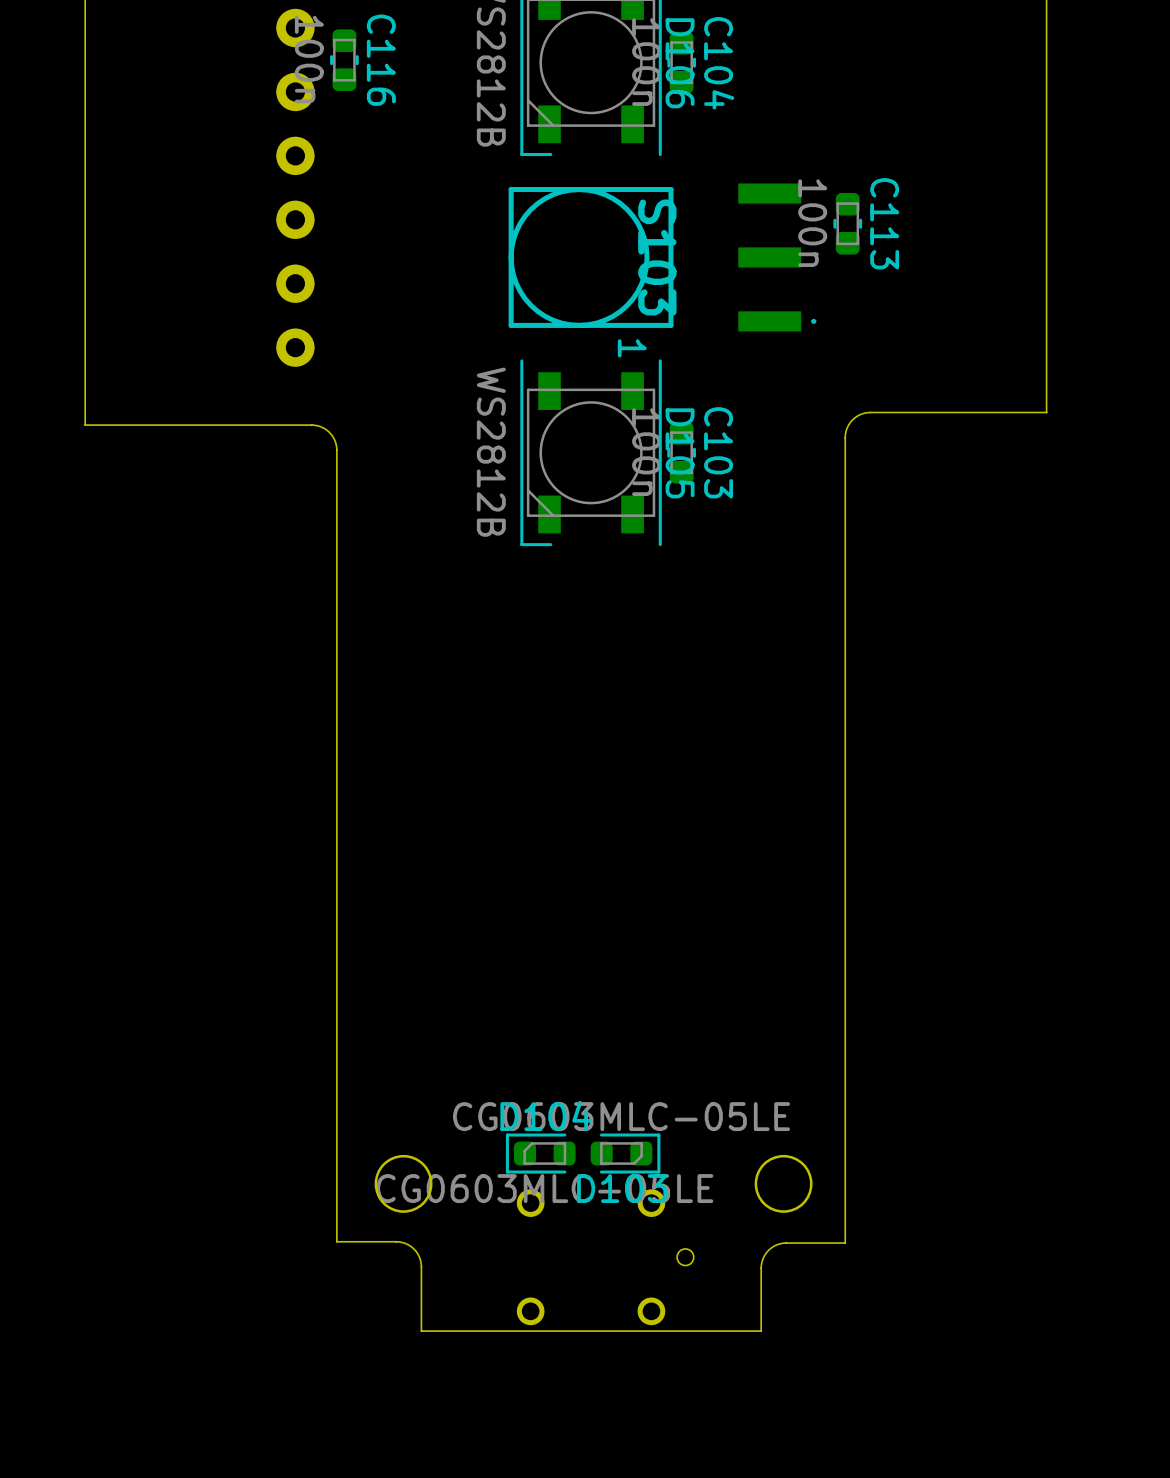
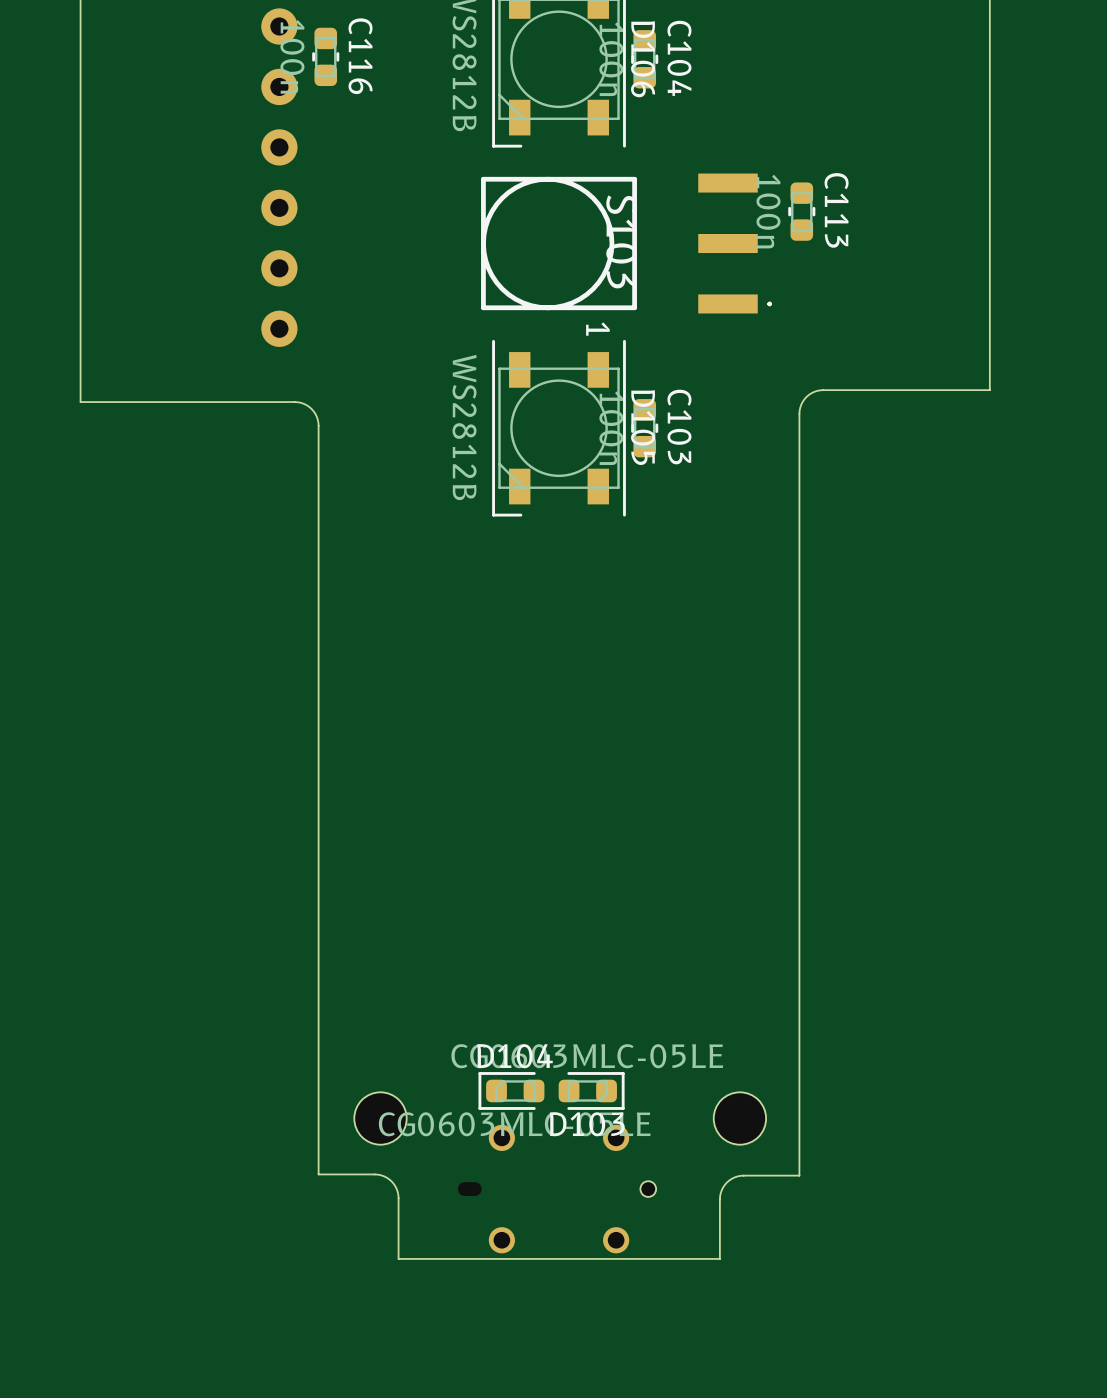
round board edge: [374, 1154, 433, 1213] -> none
round board edge: [754, 1154, 813, 1213] -> none
part: none -> (380, 1118)
part: none -> (739, 1118)

